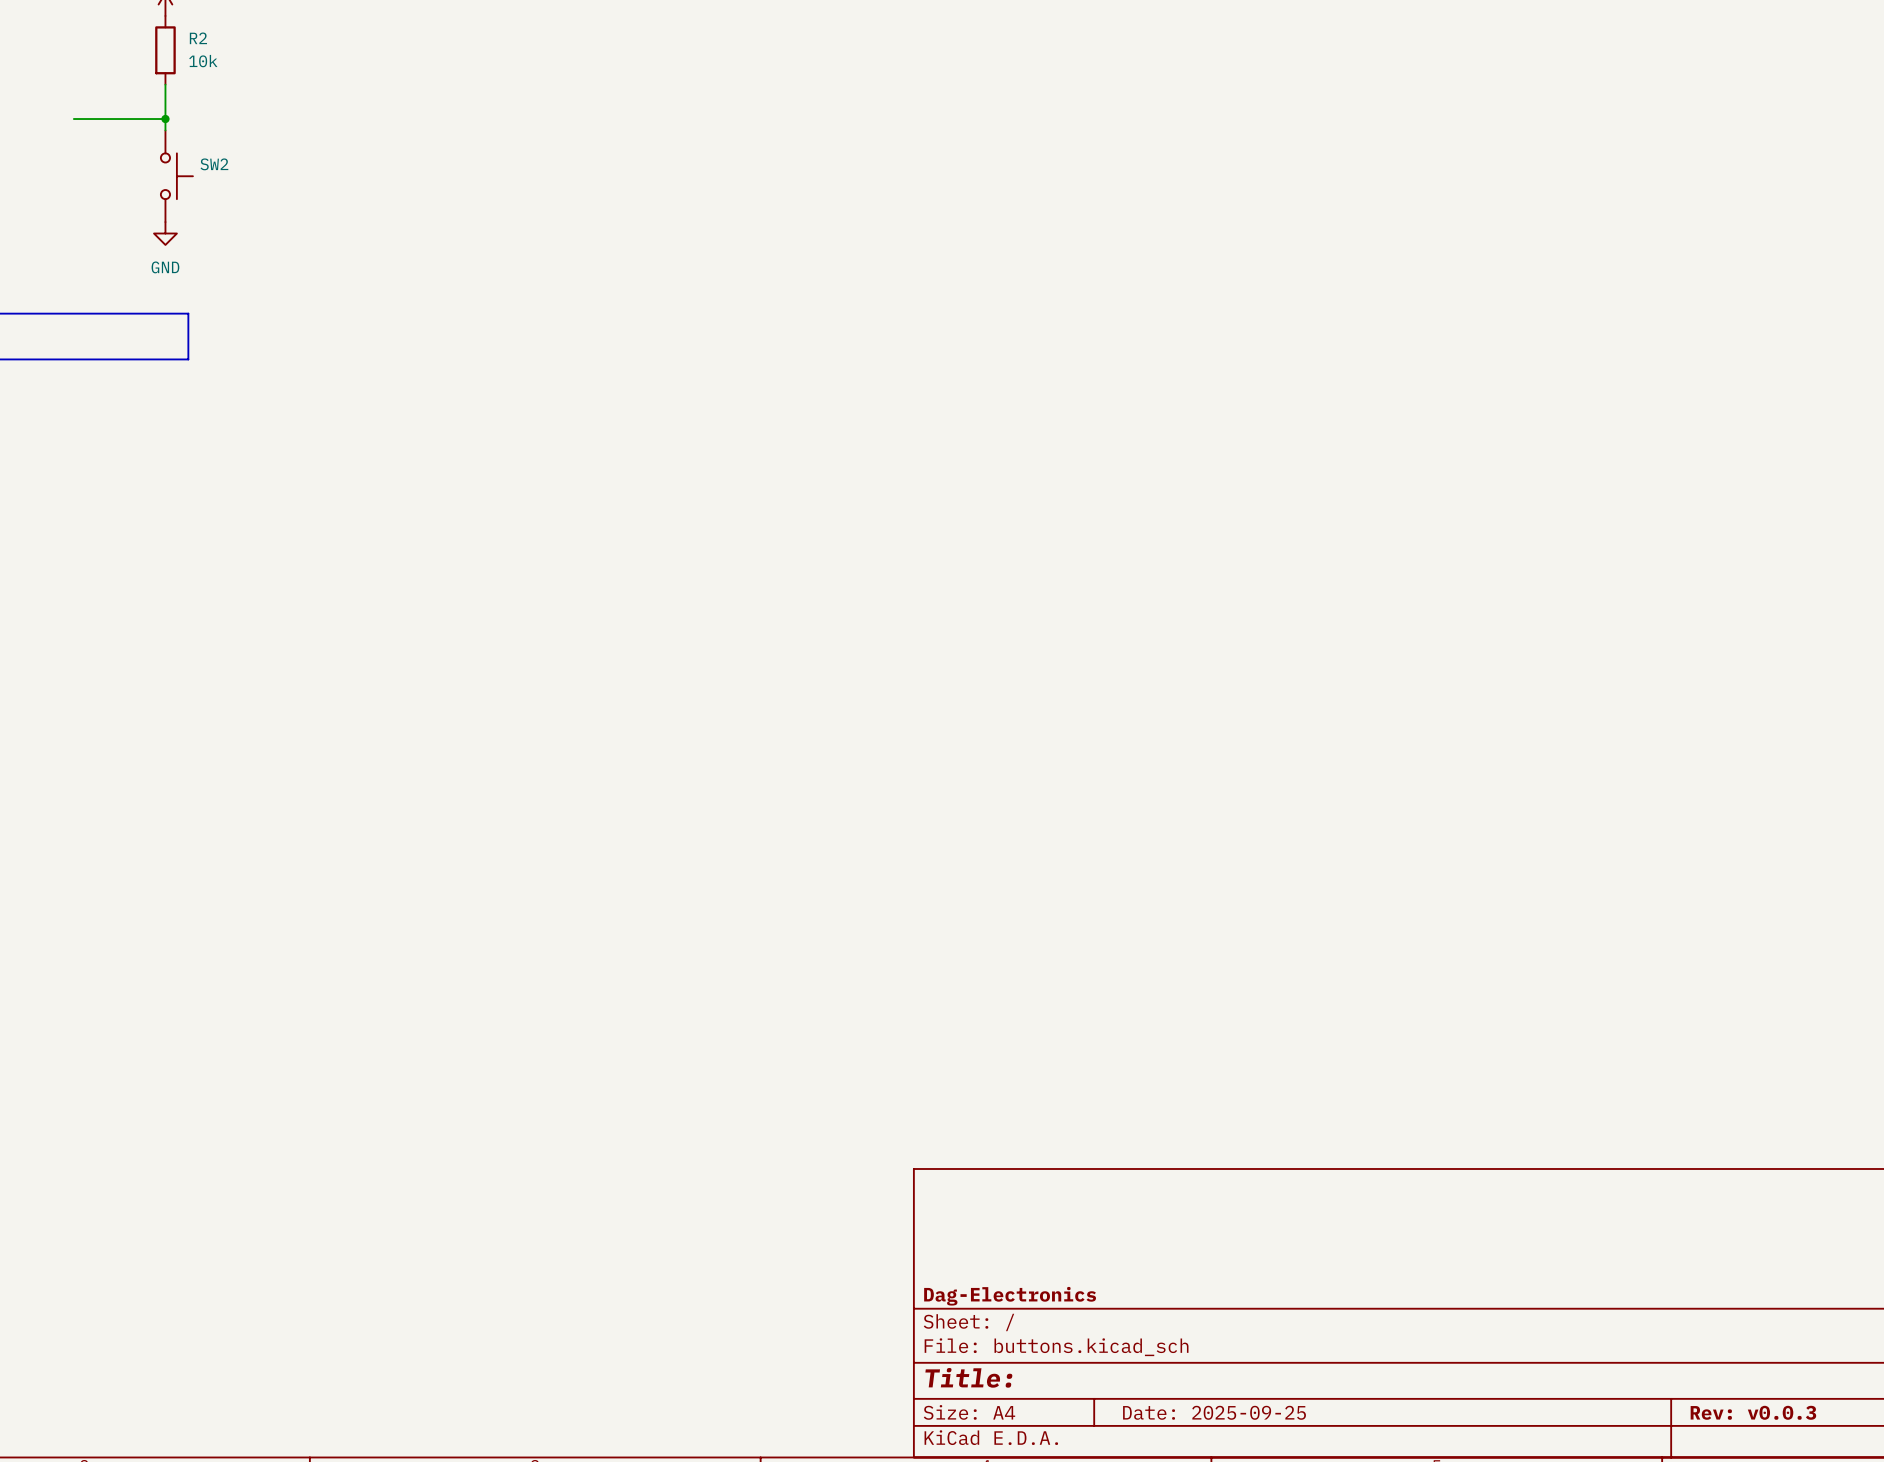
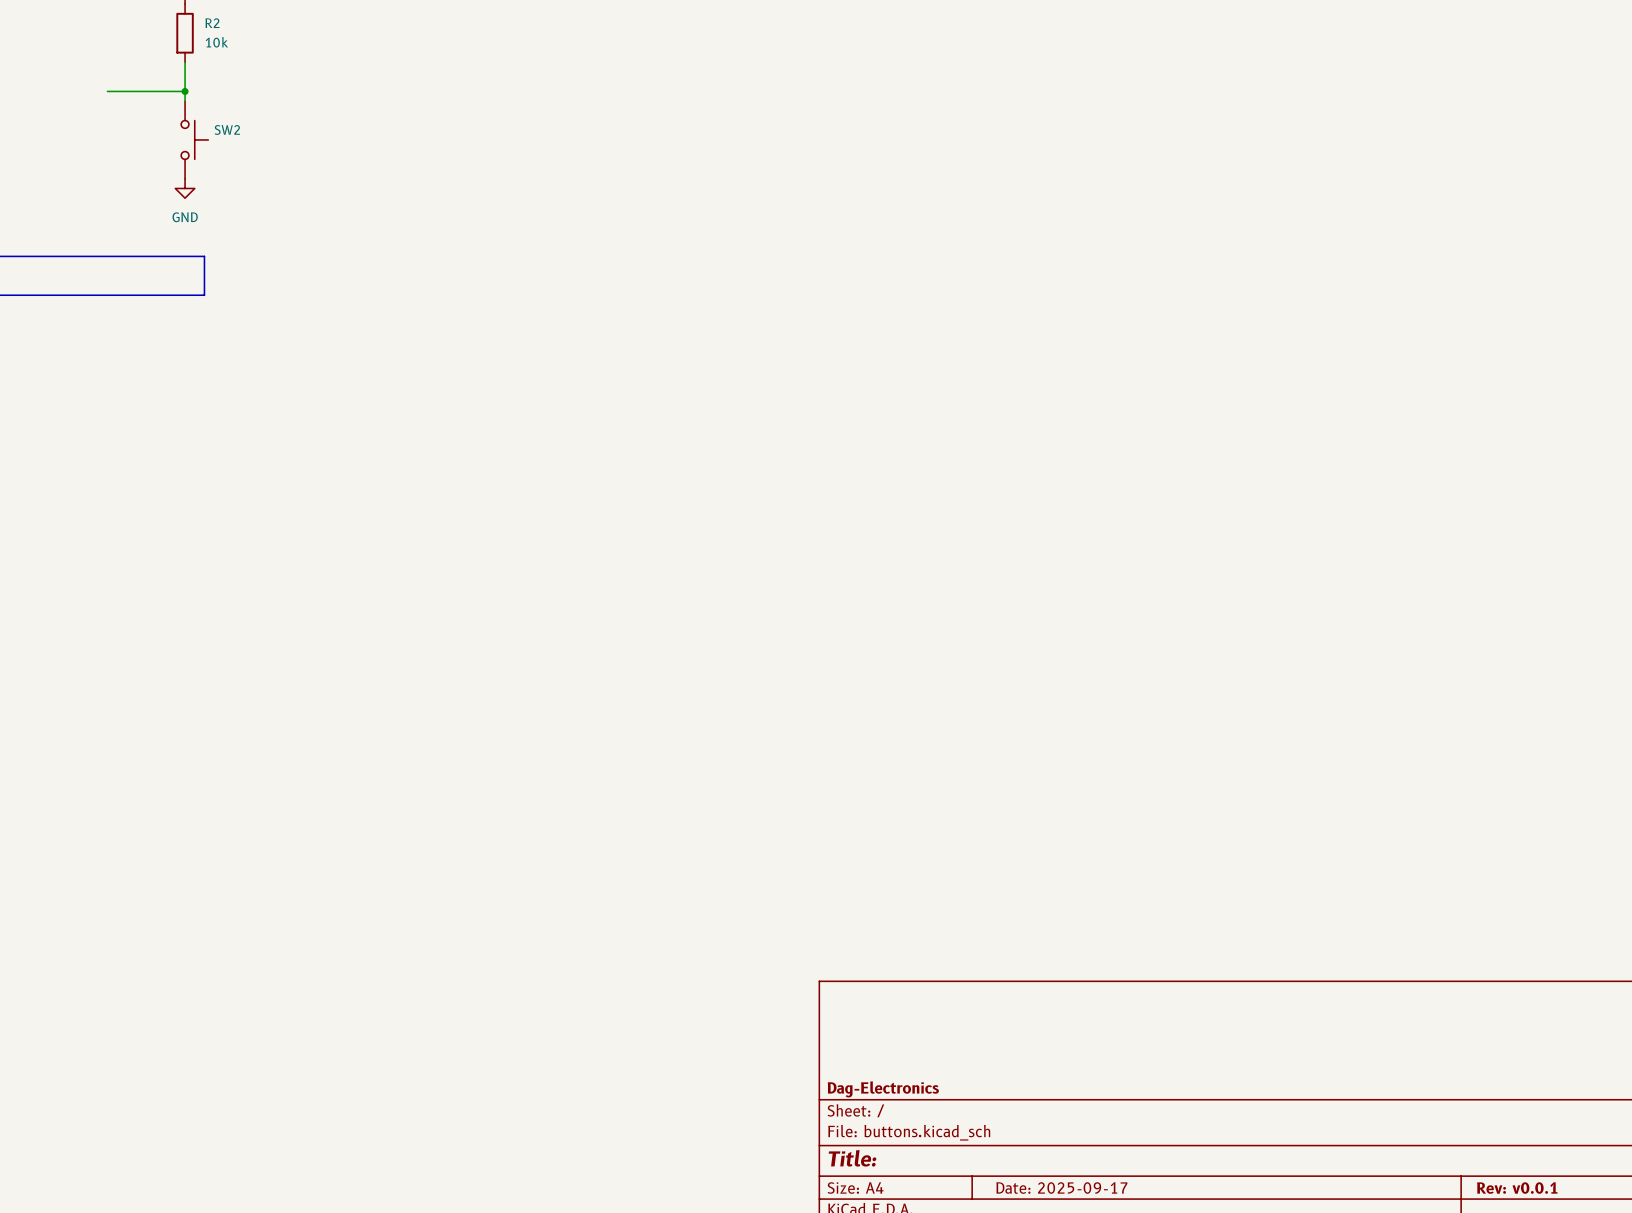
title block: Date: 2025-09-25 (1214, 1412) -> Date: 2025-09-17 (1061, 1188)
title block: Rev: v0.0.3 (1753, 1412) -> Rev: v0.0.1 (1517, 1188)

